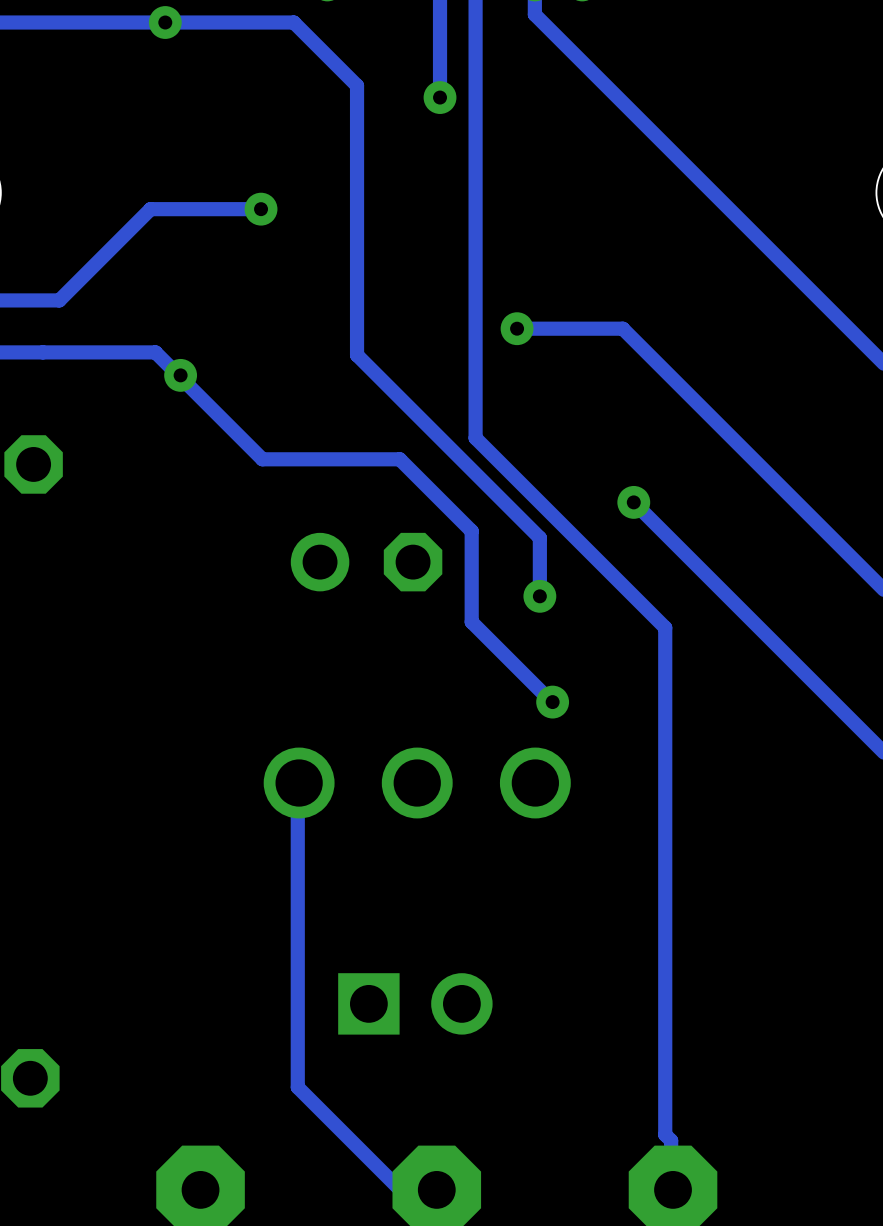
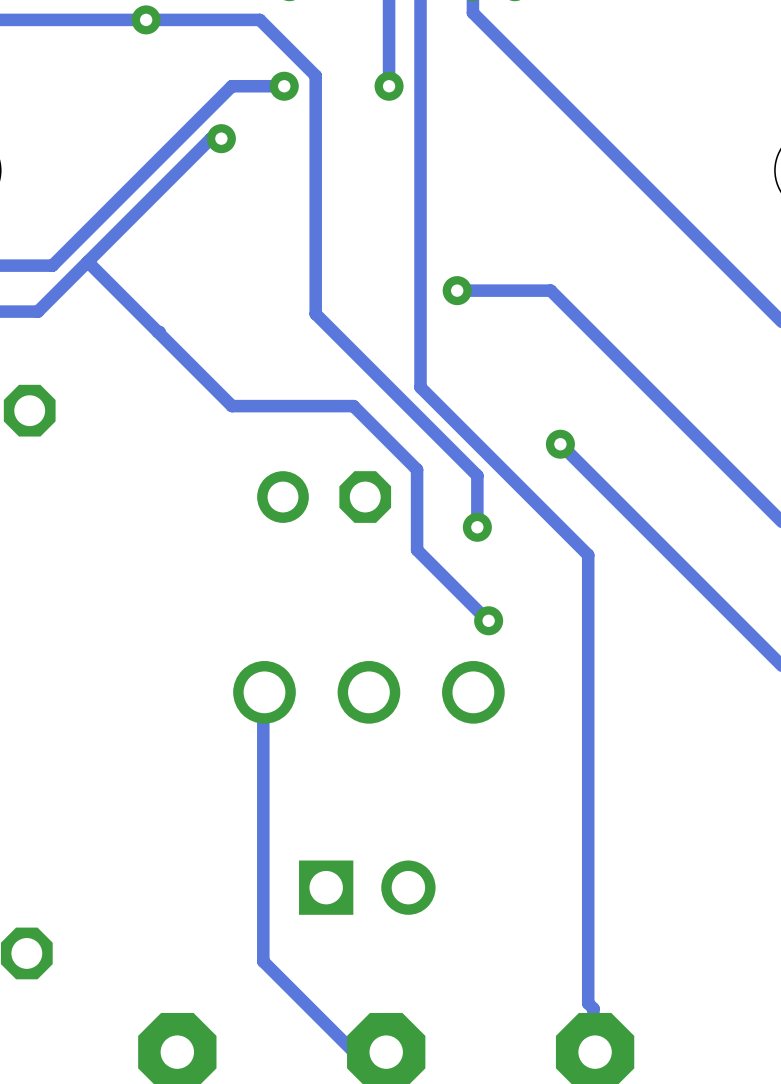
via: none -> (284, 86)
track: none -> (221, 138) (210, 138) (37, 311)
track: (261, 209) (150, 209) -> (284, 86) (231, 86) (133, 184)
via position: (261, 209) -> (221, 138)
track: (155, 352) (42, 352) -> (137, 311) (87, 261)
via: (180, 375) -> none

